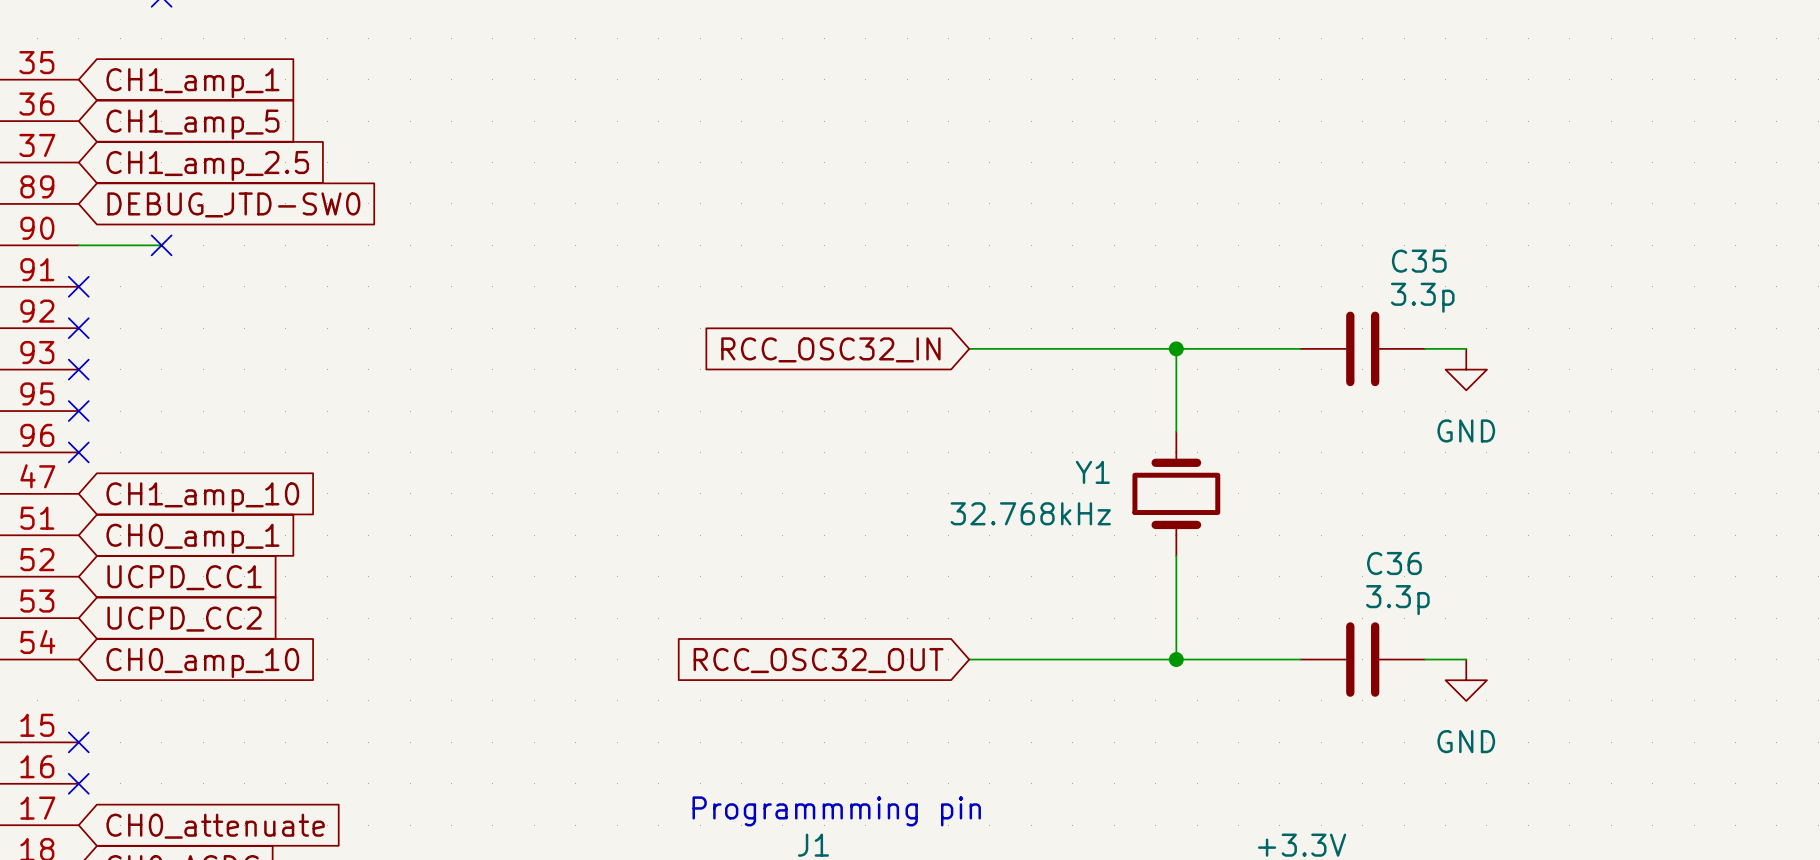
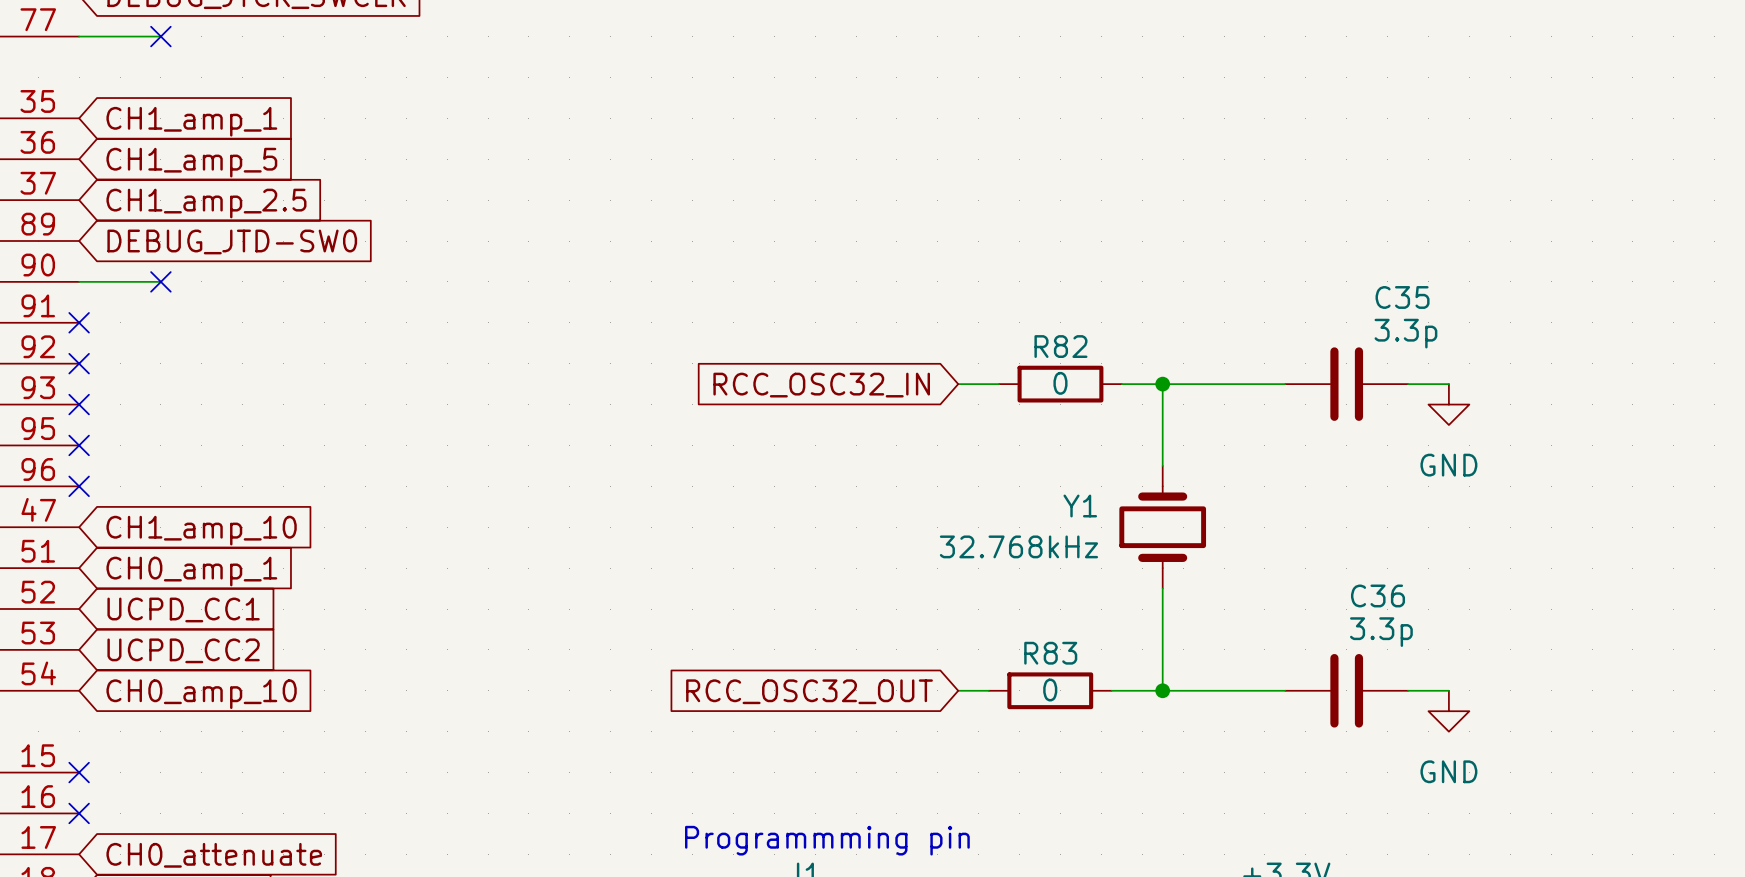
wire: (1010, 348) (1134, 348) -> none
R82: none -> 0 (1060, 384)
wire: (1000, 659) (1124, 659) -> none
R83: none -> 0 (1050, 690)

